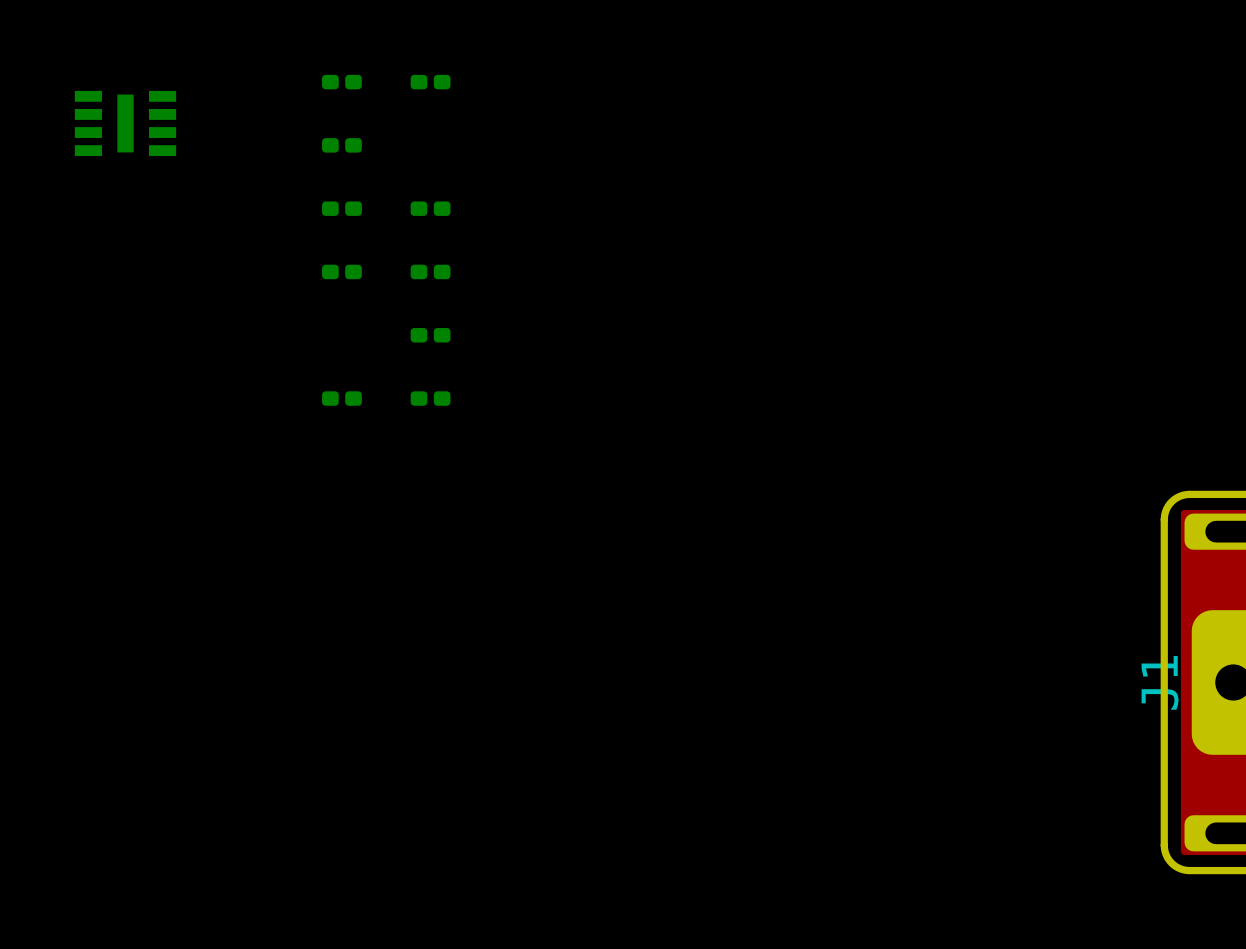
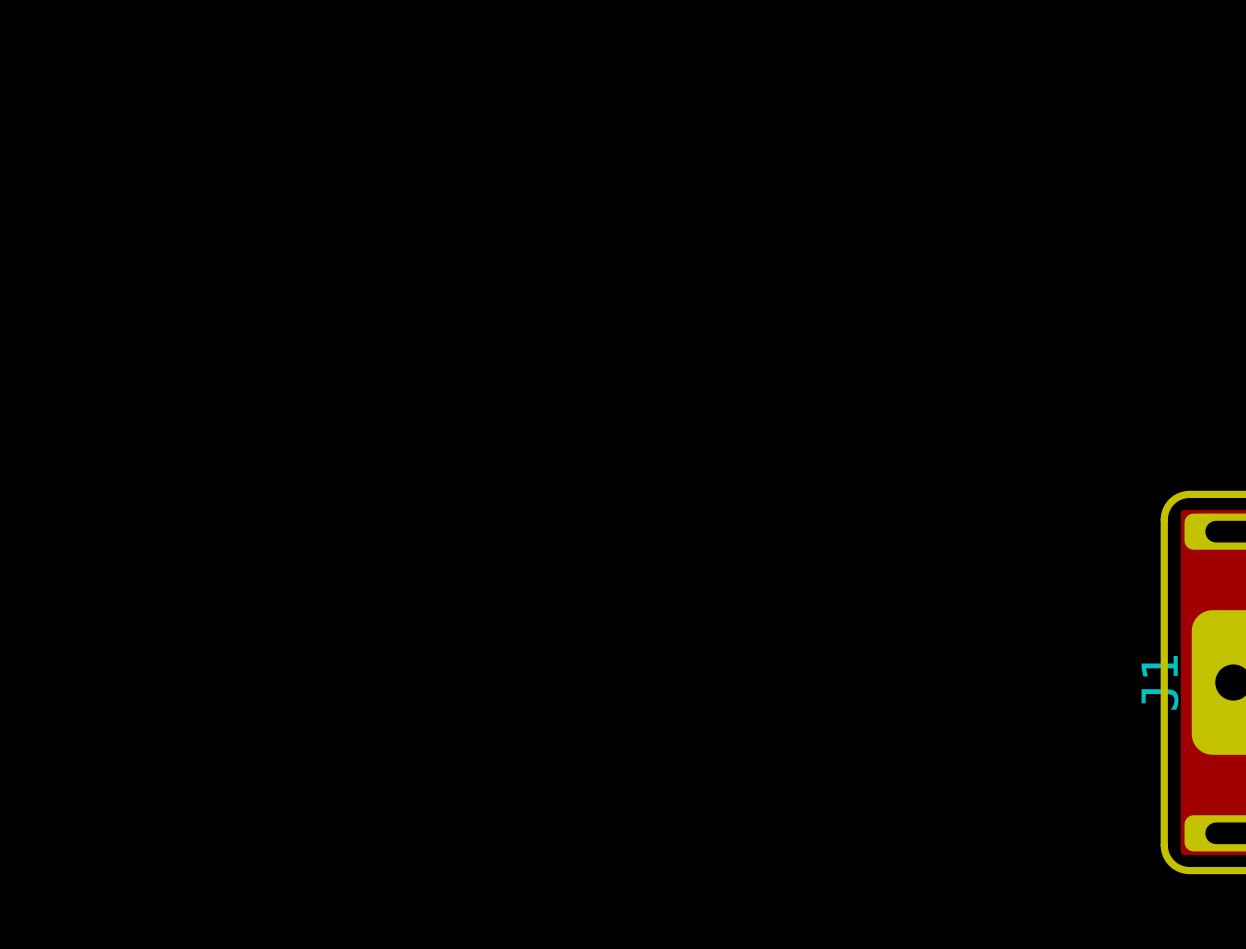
part: (341, 82) -> none
part: (430, 82) -> none
part: (125, 123) -> none
part: (341, 145) -> none
part: (341, 208) -> none
part: (430, 208) -> none
part: (341, 271) -> none
part: (430, 271) -> none
part: (430, 335) -> none
part: (341, 398) -> none
part: (430, 398) -> none

